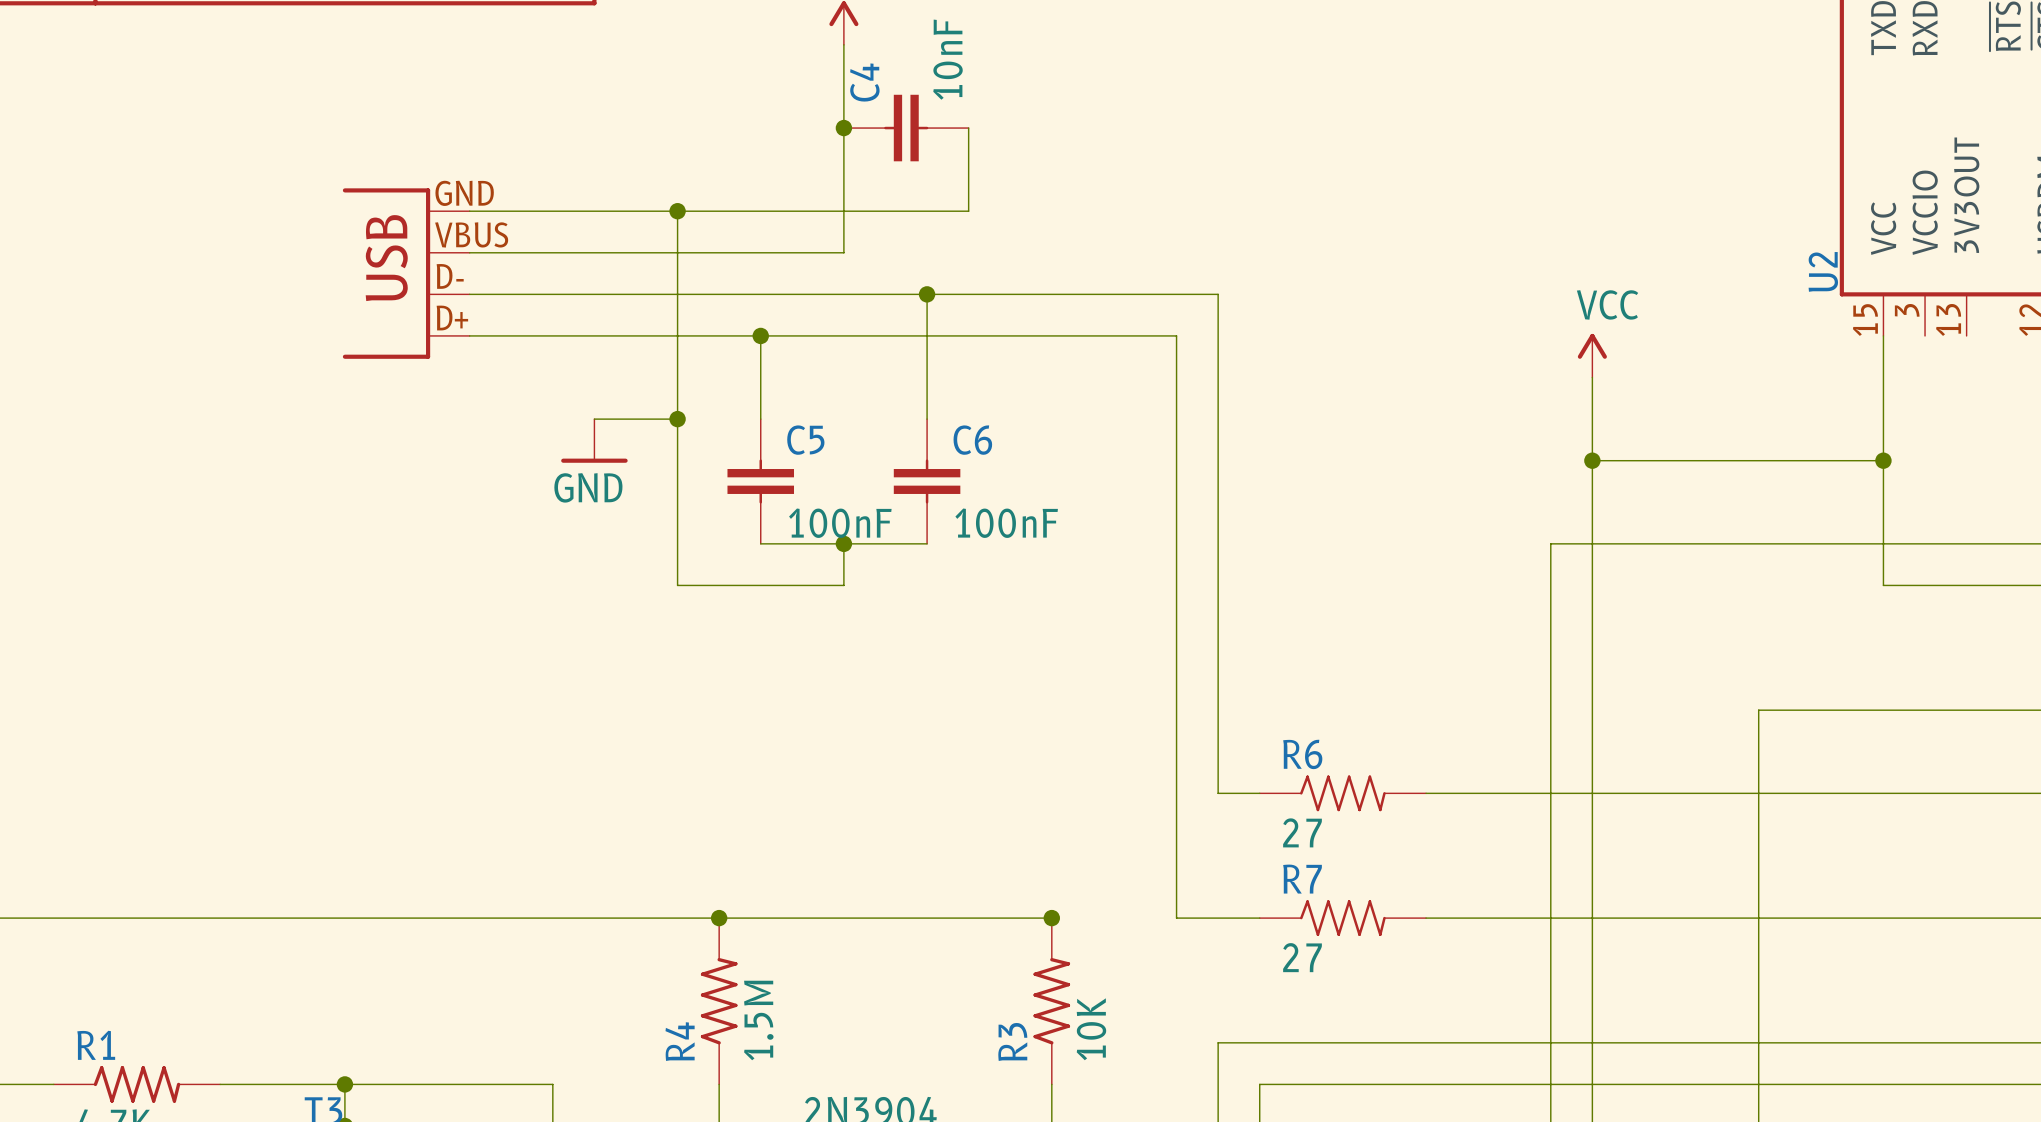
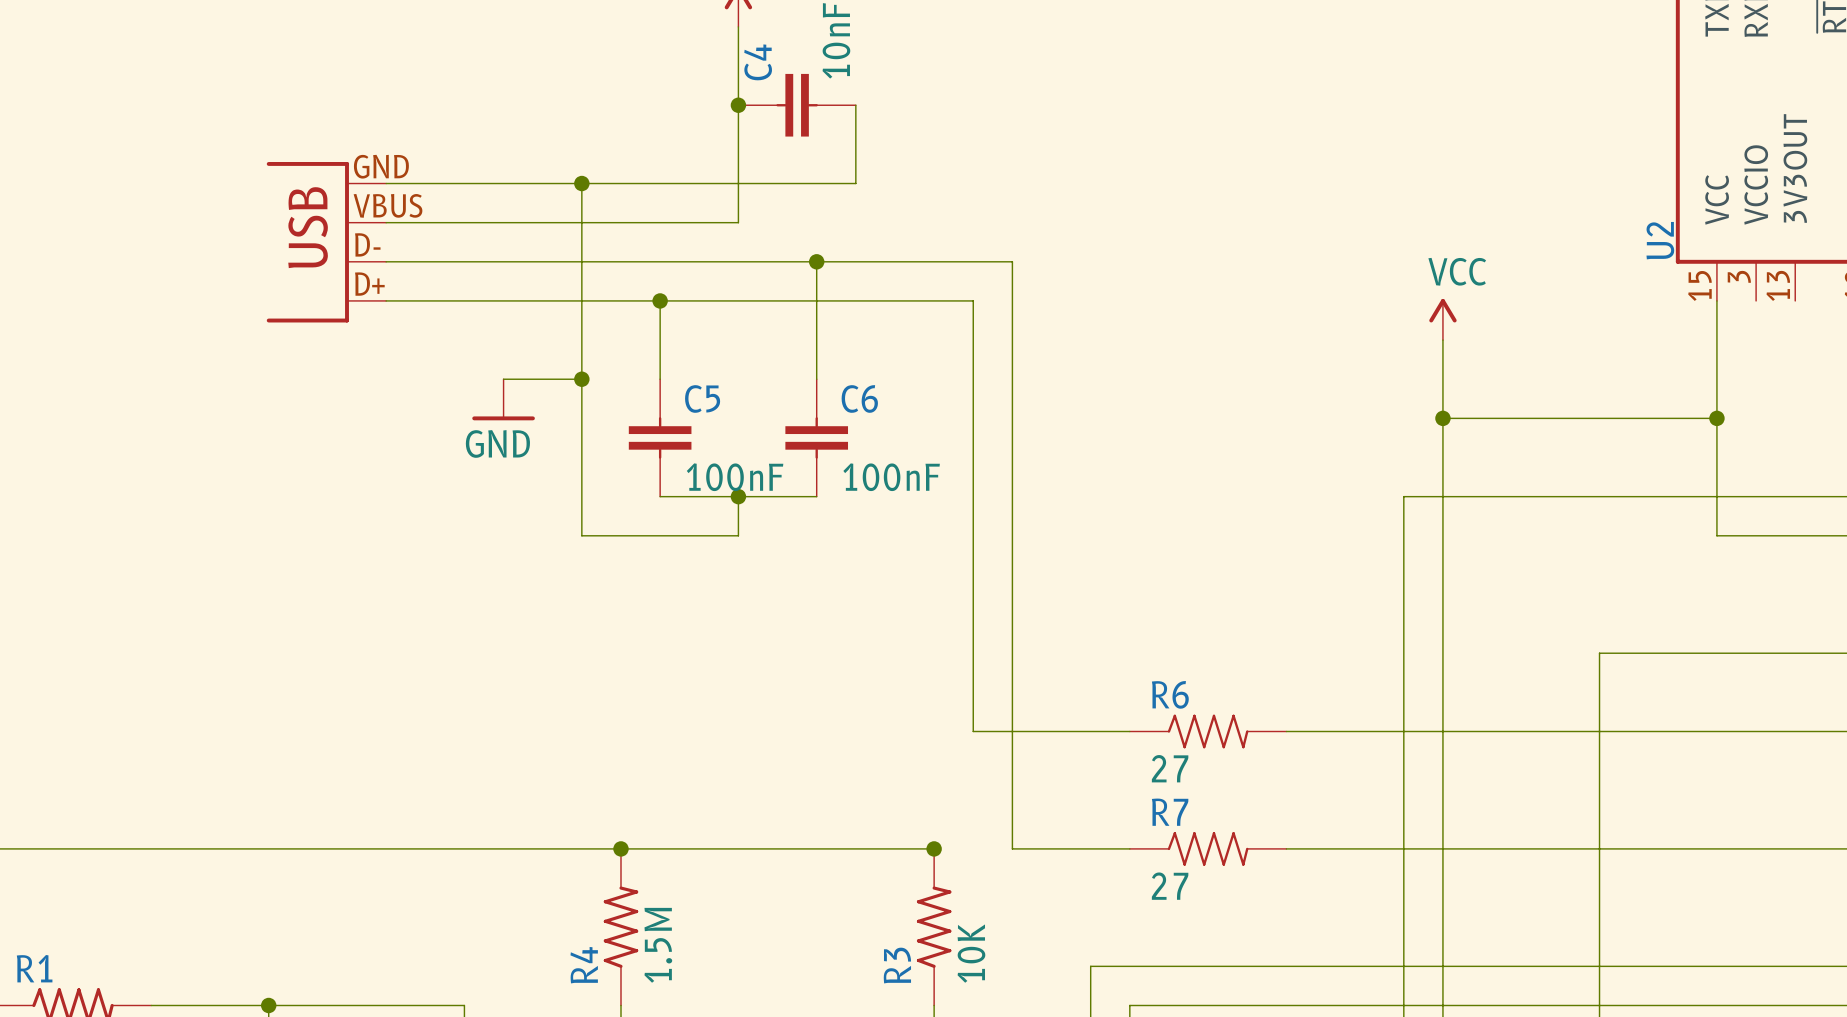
wire: (1134, 294) (1218, 294) (1218, 793) -> (973, 300) (973, 731) (1090, 731)
wire: (1093, 335) (1176, 335) (1176, 918) -> (1012, 261) (1012, 848) (1051, 848)

